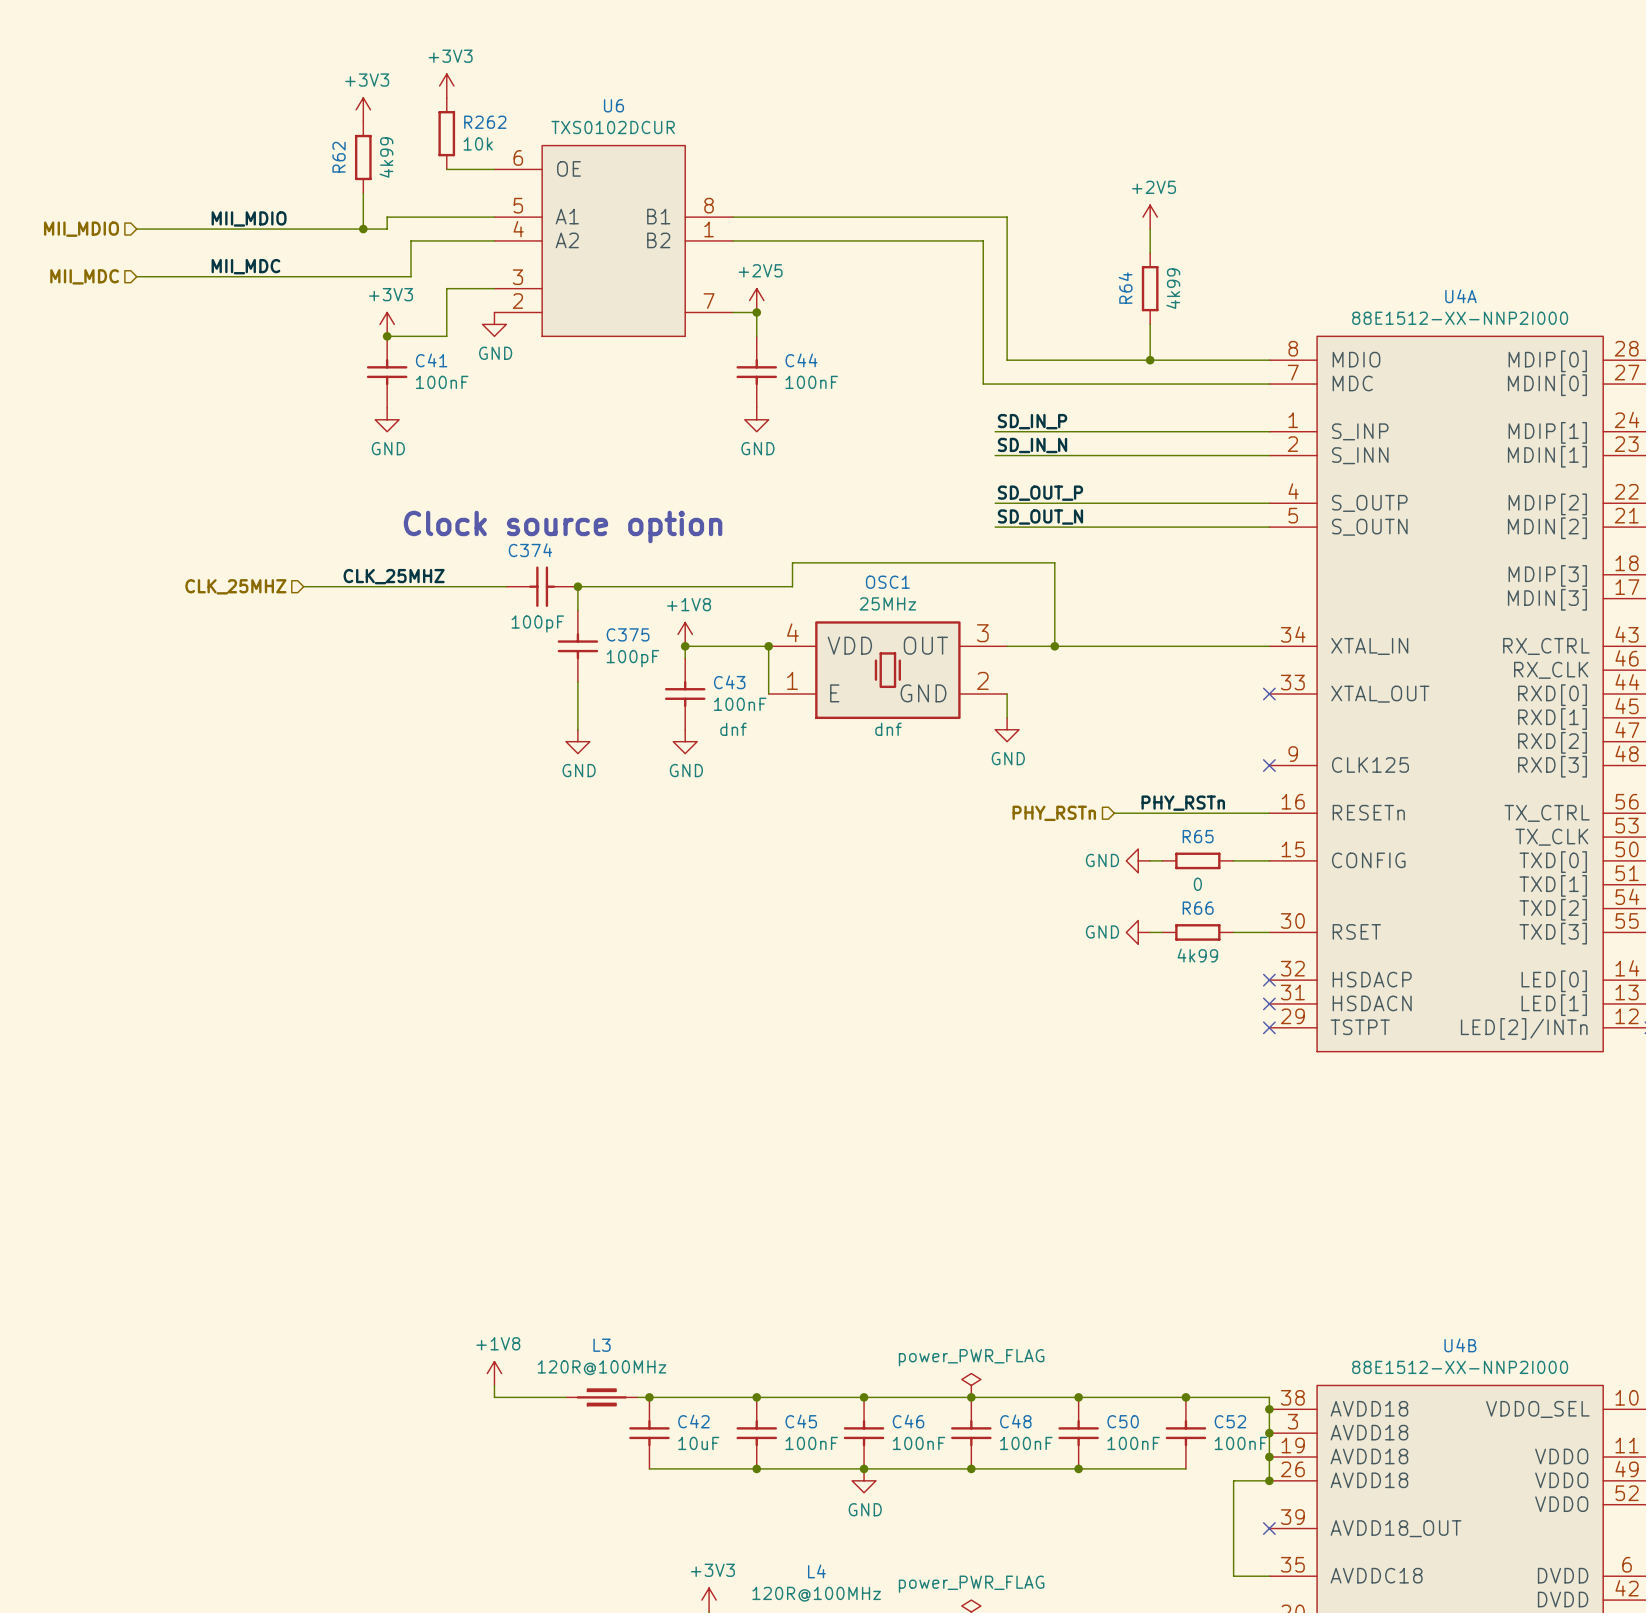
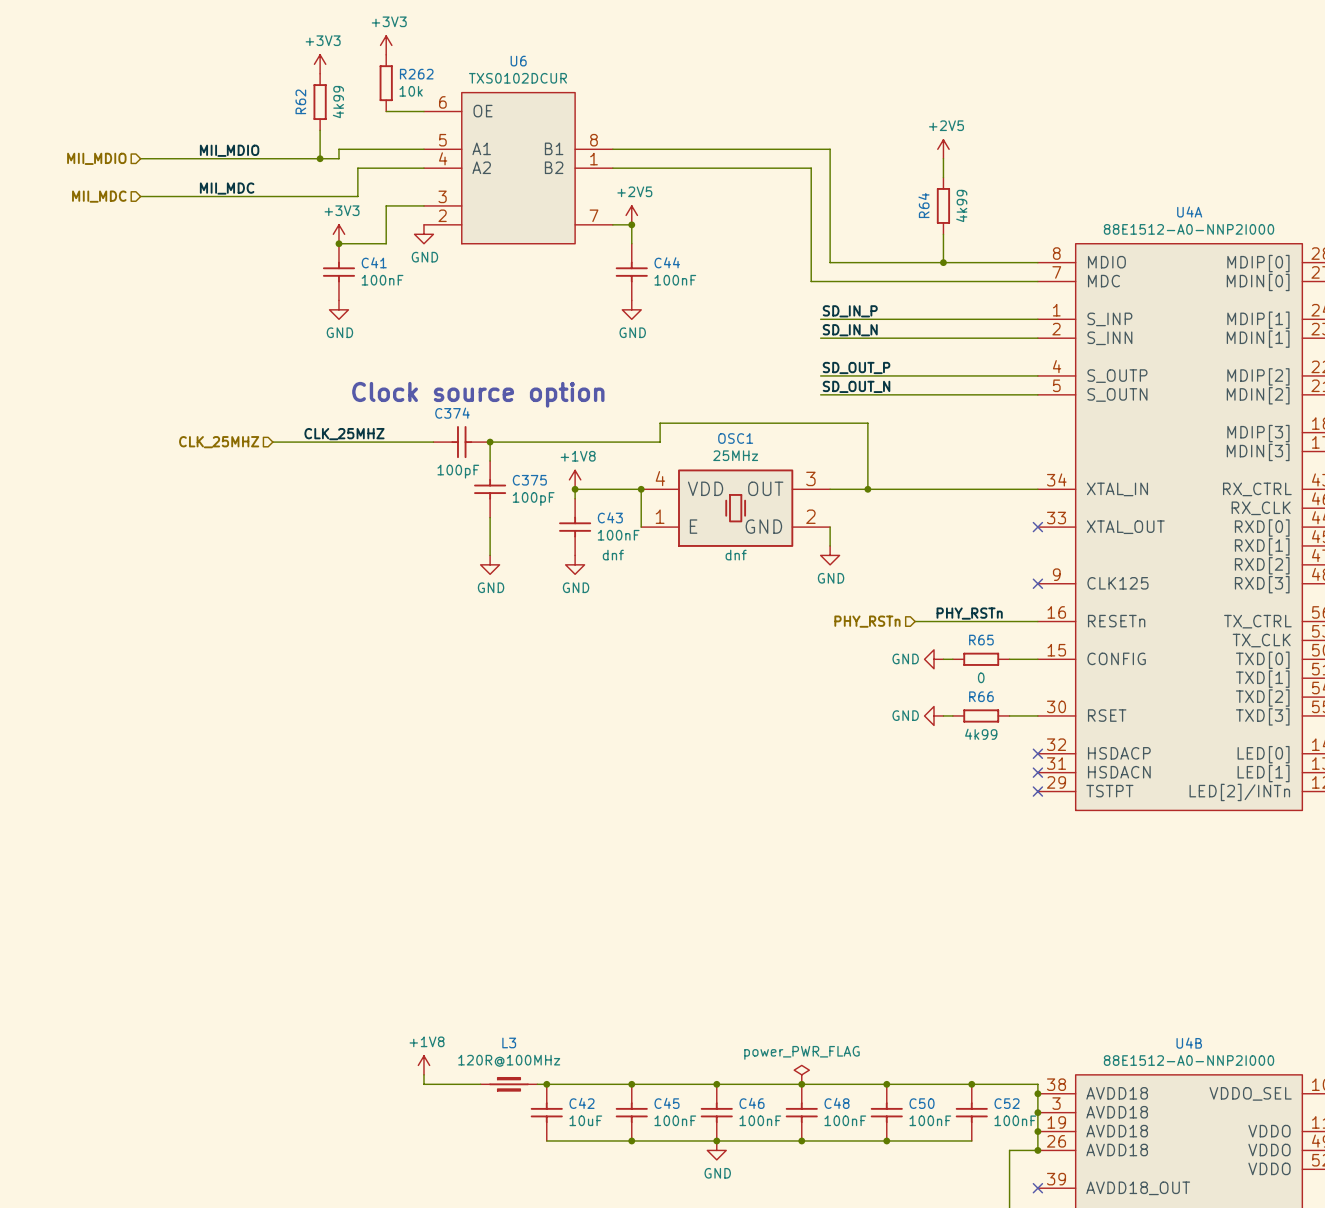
U4A value: 88E1512-XX-NNP2I000 (1460, 318) -> 88E1512-A0-NNP2I000 (1189, 229)
U4B value: 88E1512-XX-NNP2I000 (1460, 1367) -> 88E1512-A0-NNP2I000 (1189, 1060)

